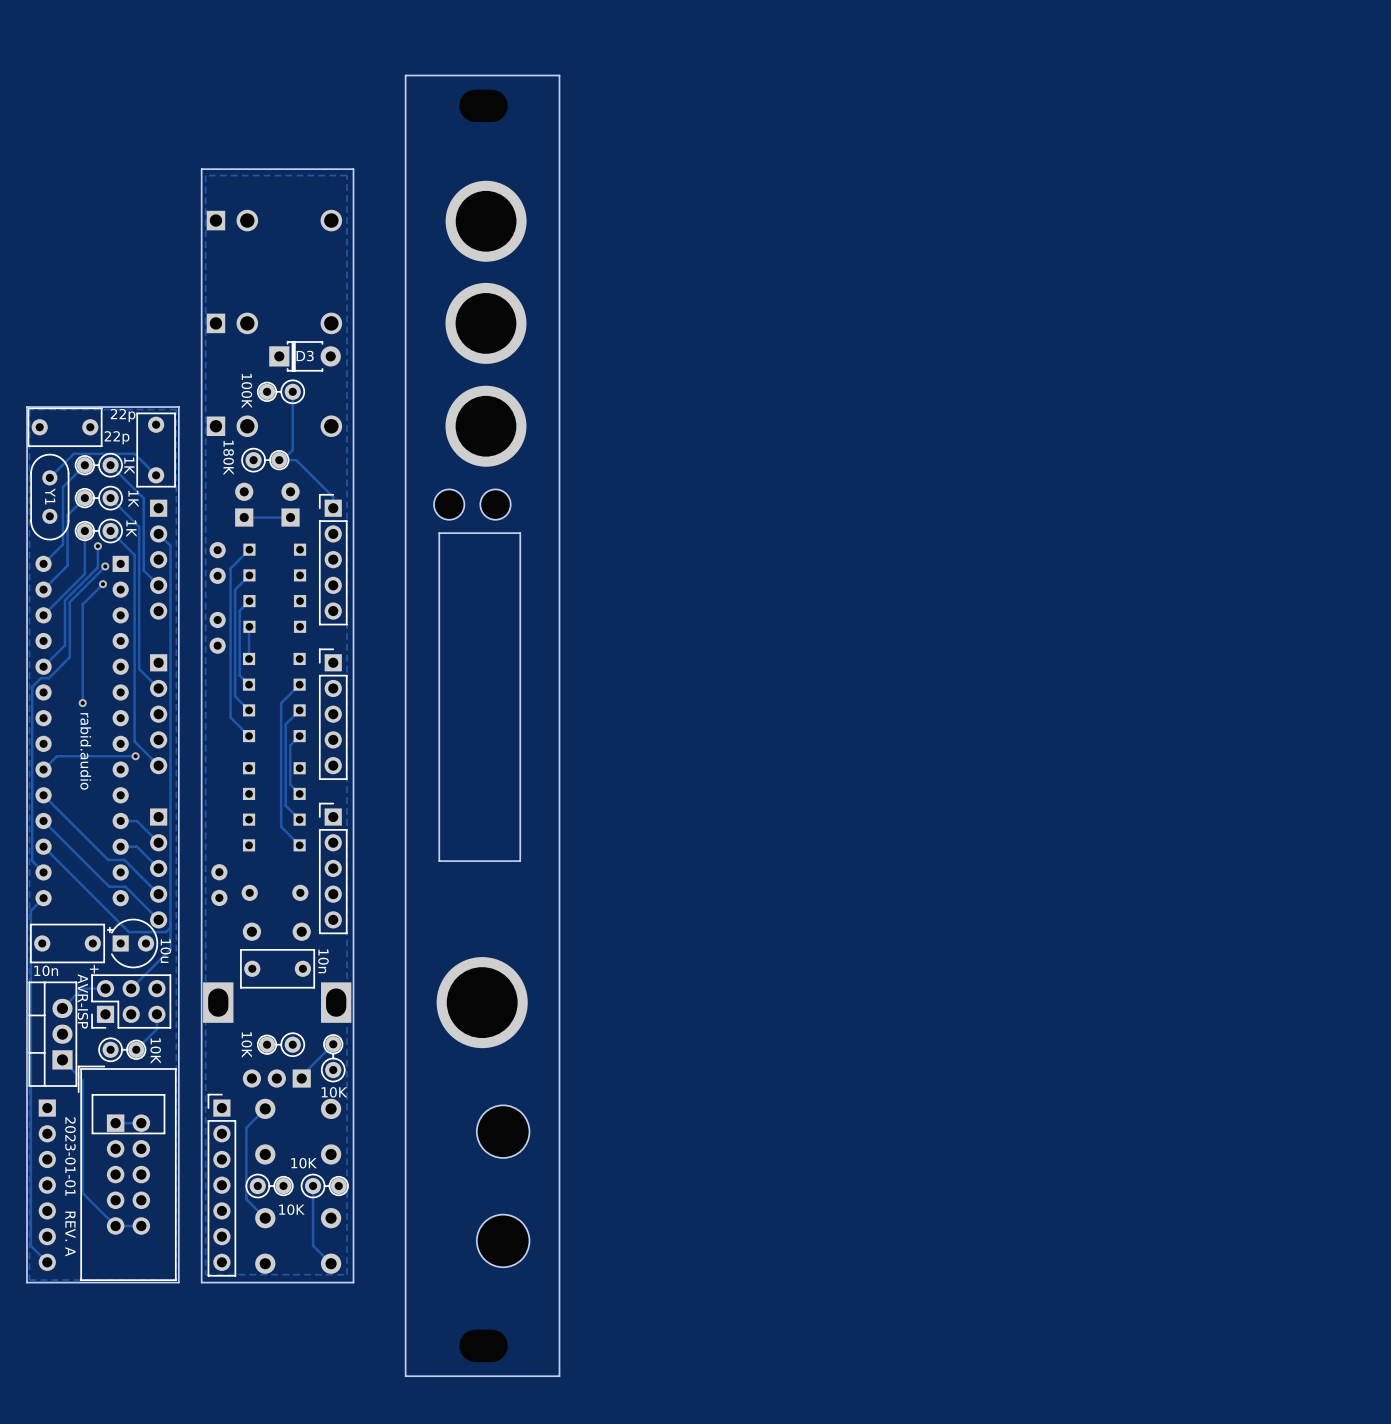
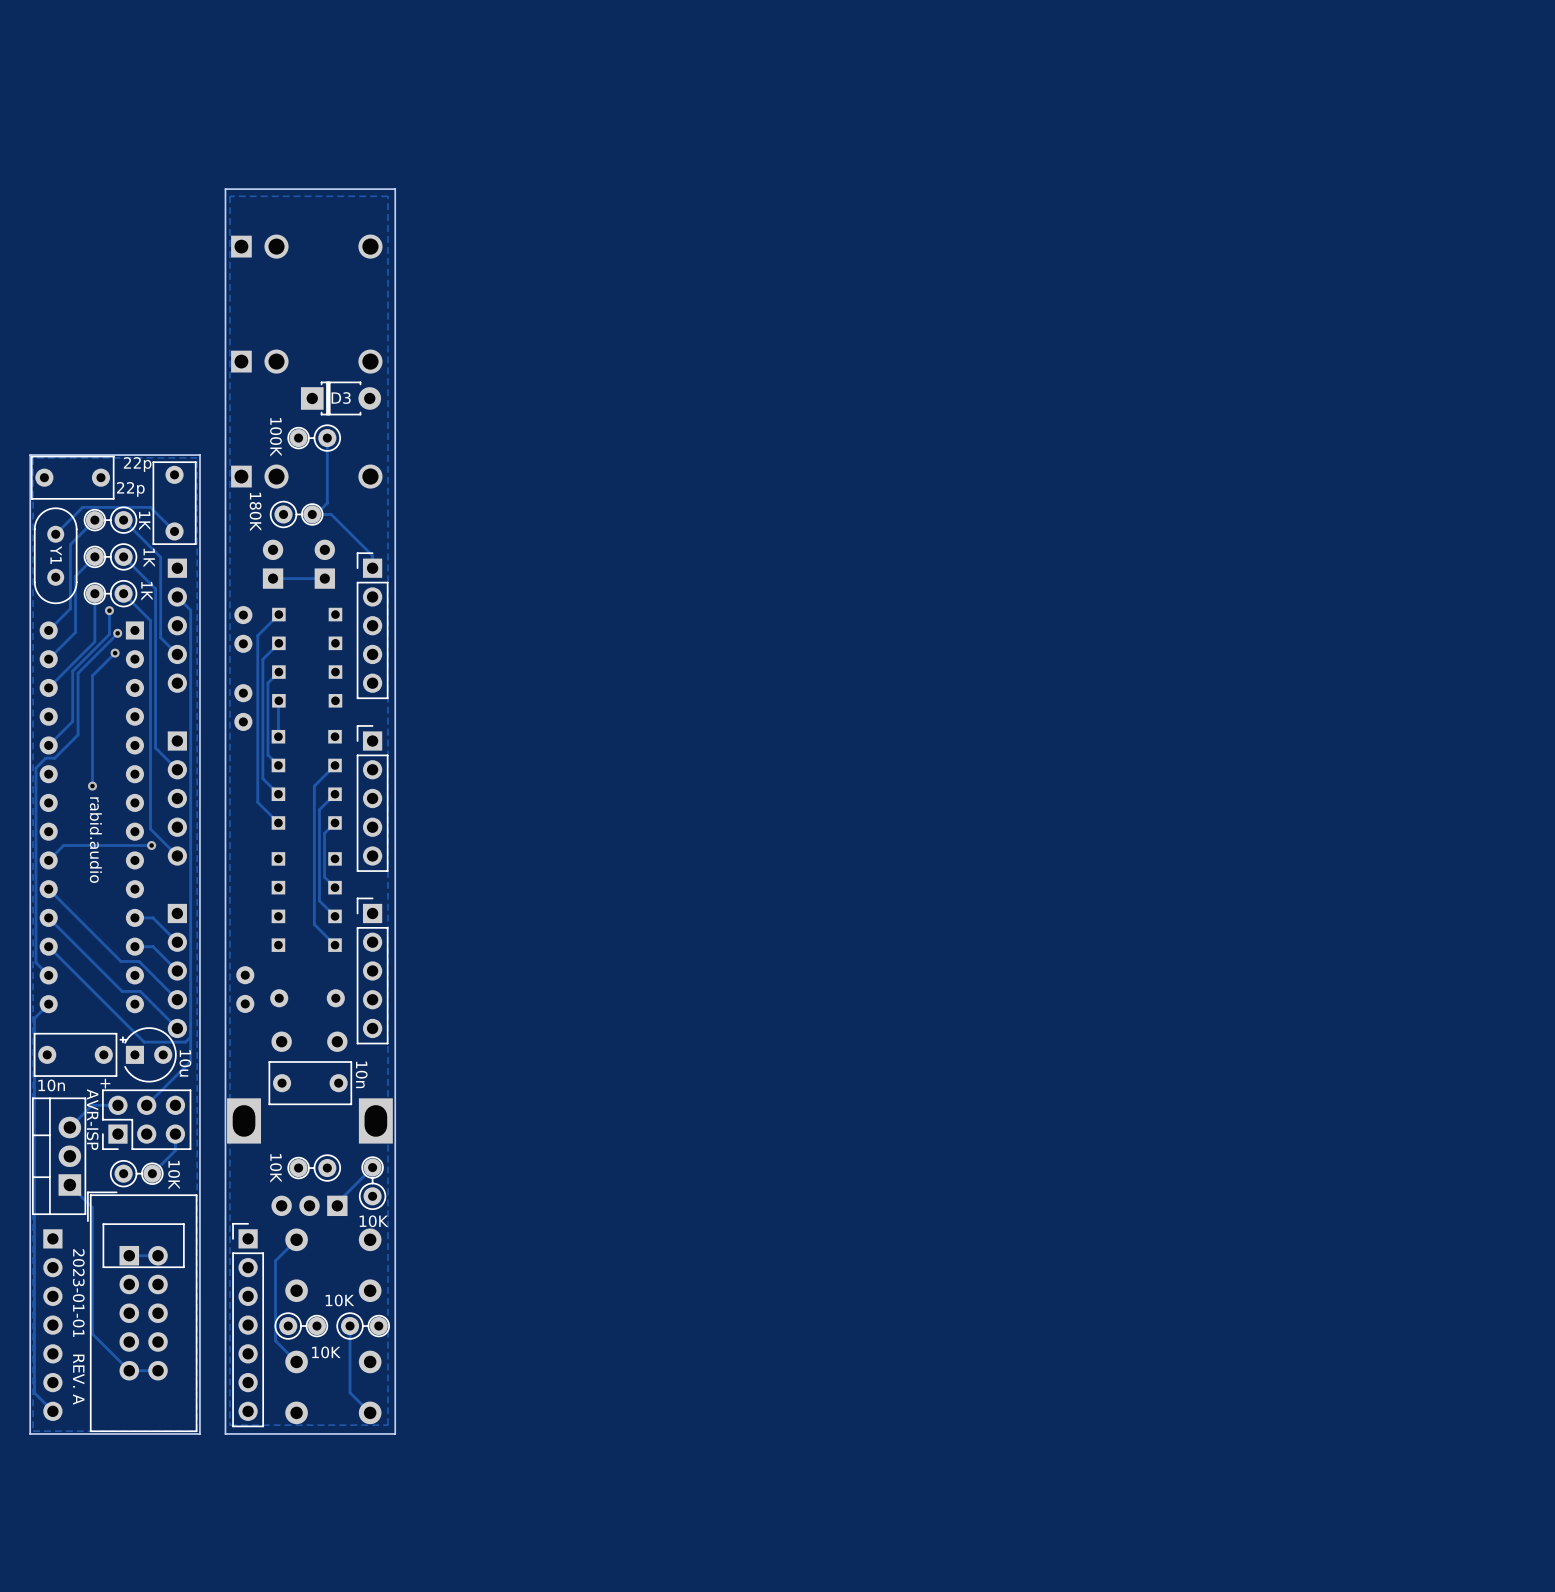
board edge: (559, 75) (405, 75) (405, 1376) (559, 1376) (559, 75) -> none
part: (483, 105) -> none
part: (486, 221) -> none
part: (485, 323) -> none
part: (485, 426) -> none
part: (449, 504) -> none
part: (495, 504) -> none
board edge: (520, 533) (439, 533) (439, 861) (520, 861) (520, 533) -> none
part: (482, 1002) -> none
part: (503, 1131) -> none
part: (503, 1240) -> none
part: (483, 1345) -> none

